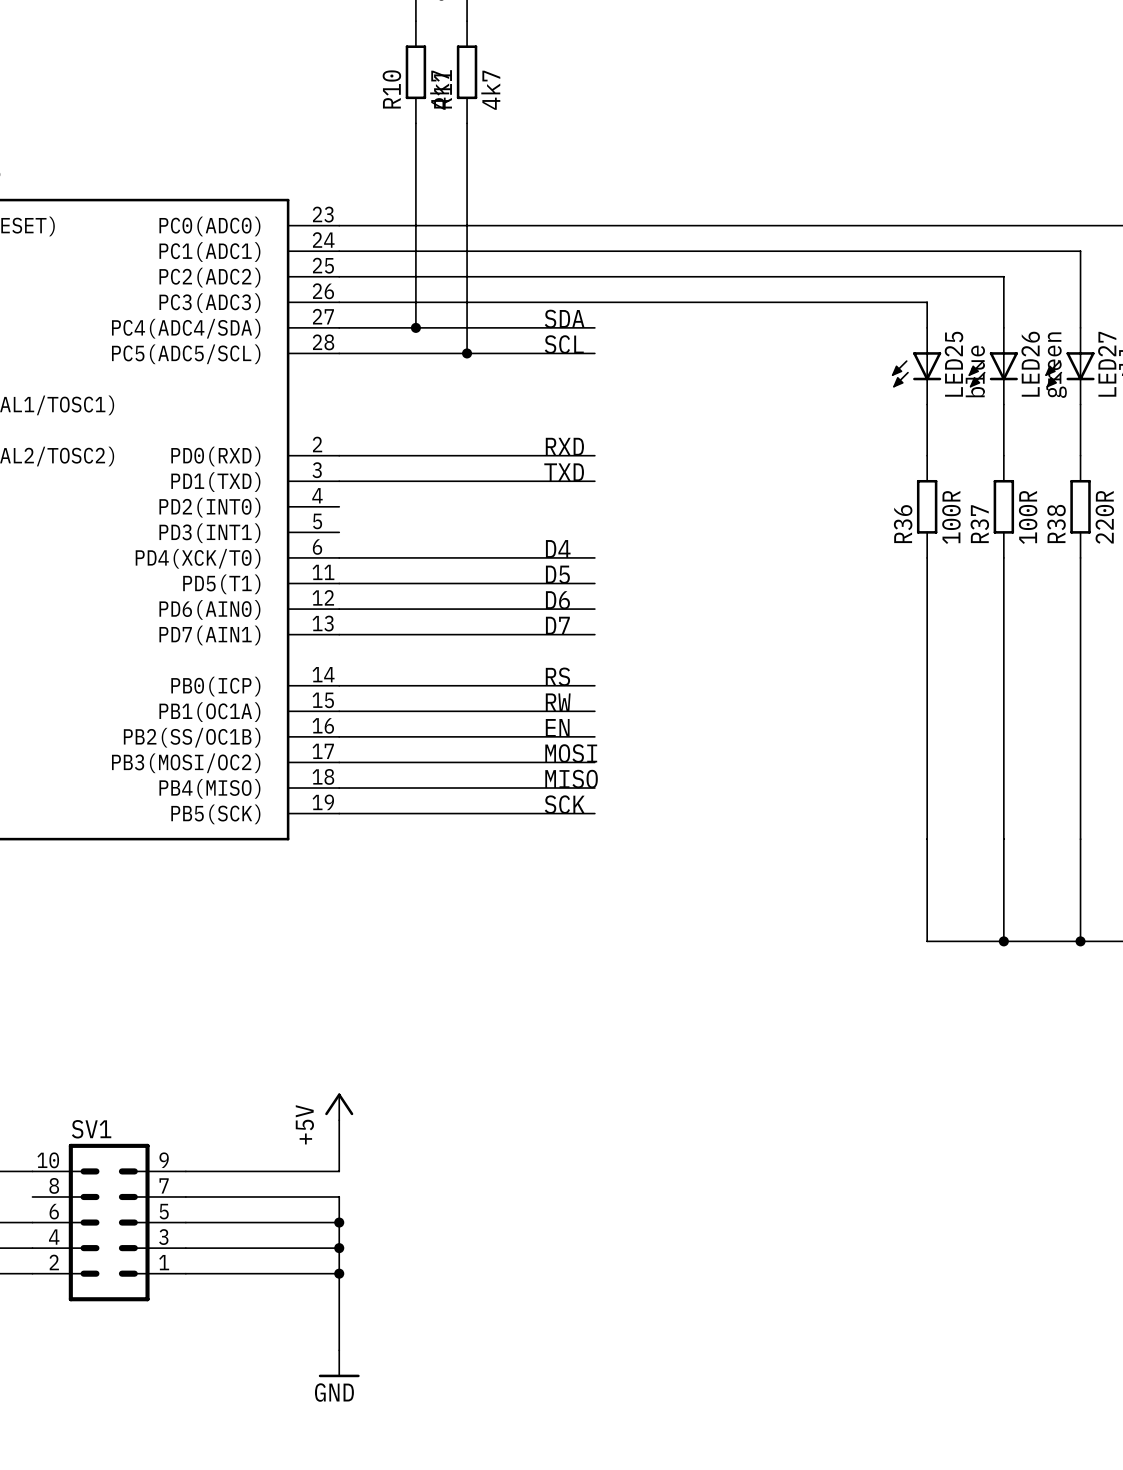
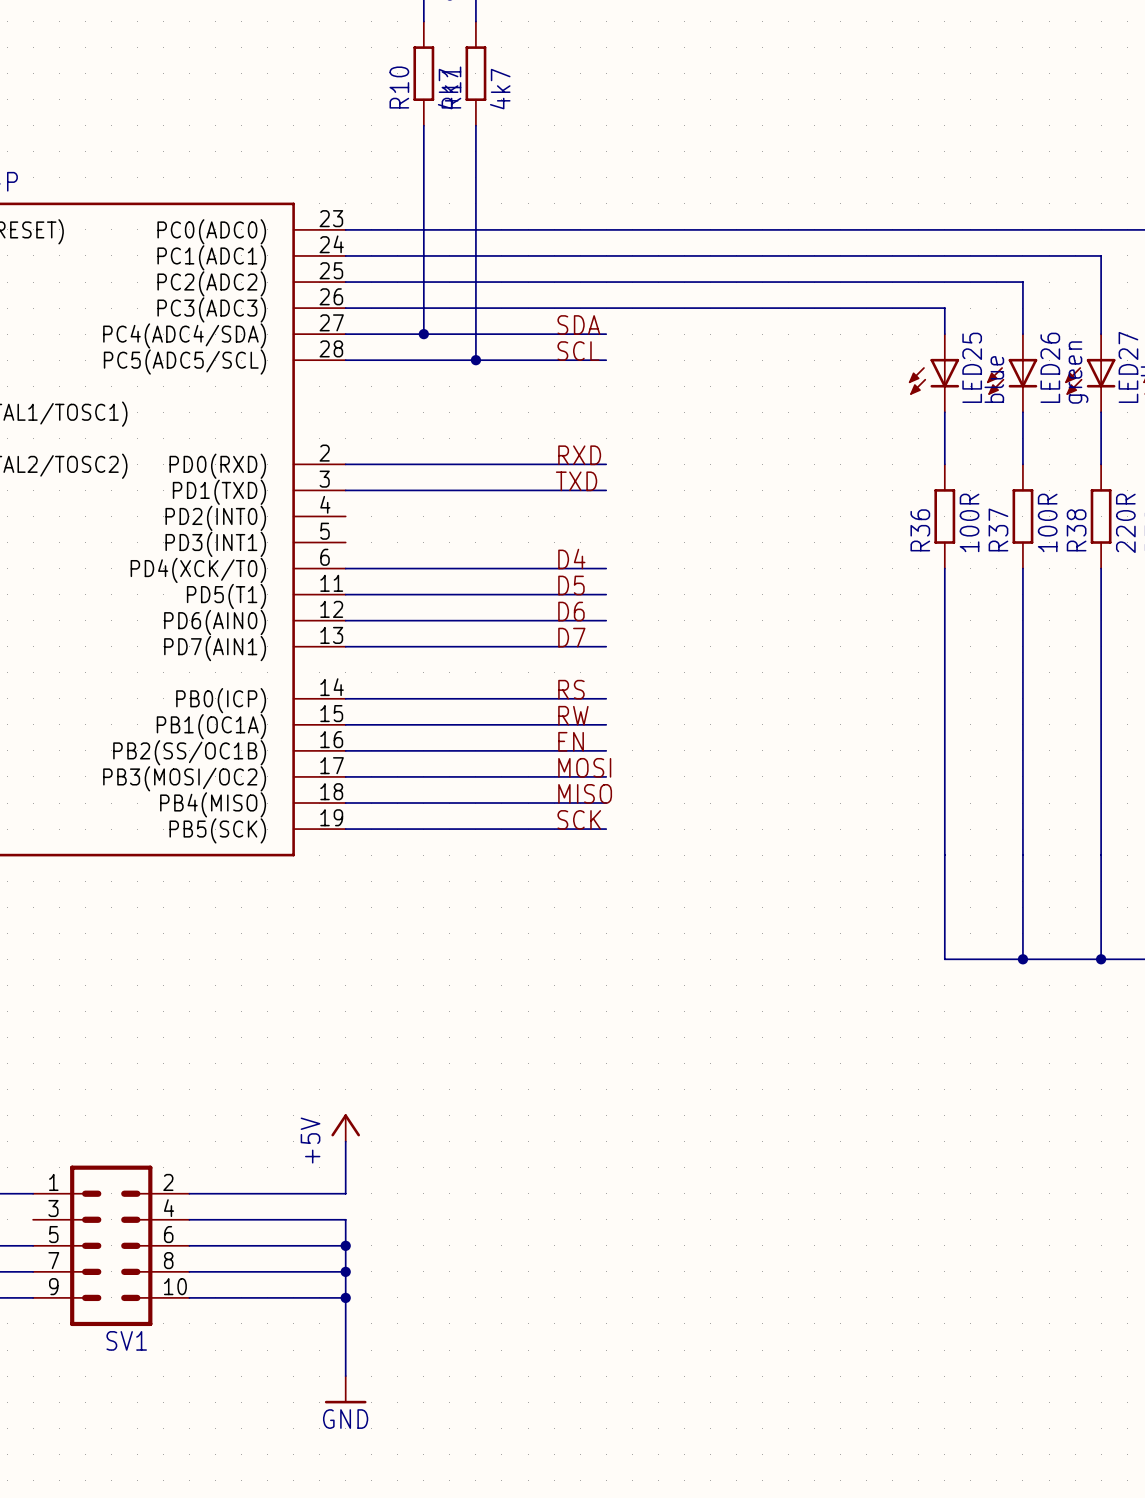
SV1 rotation: 0° (109, 1222) -> 180° (111, 1245)

